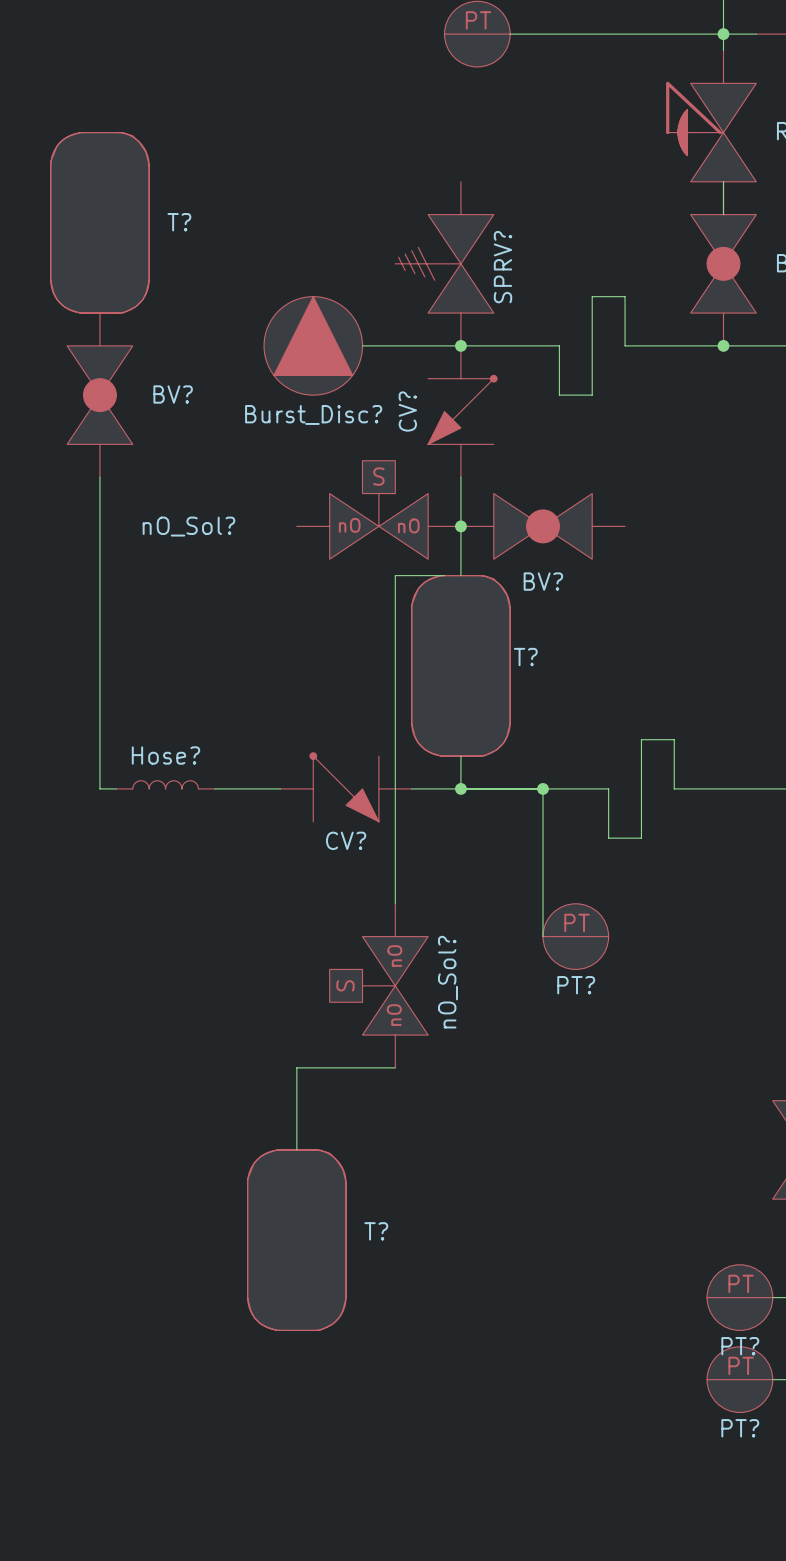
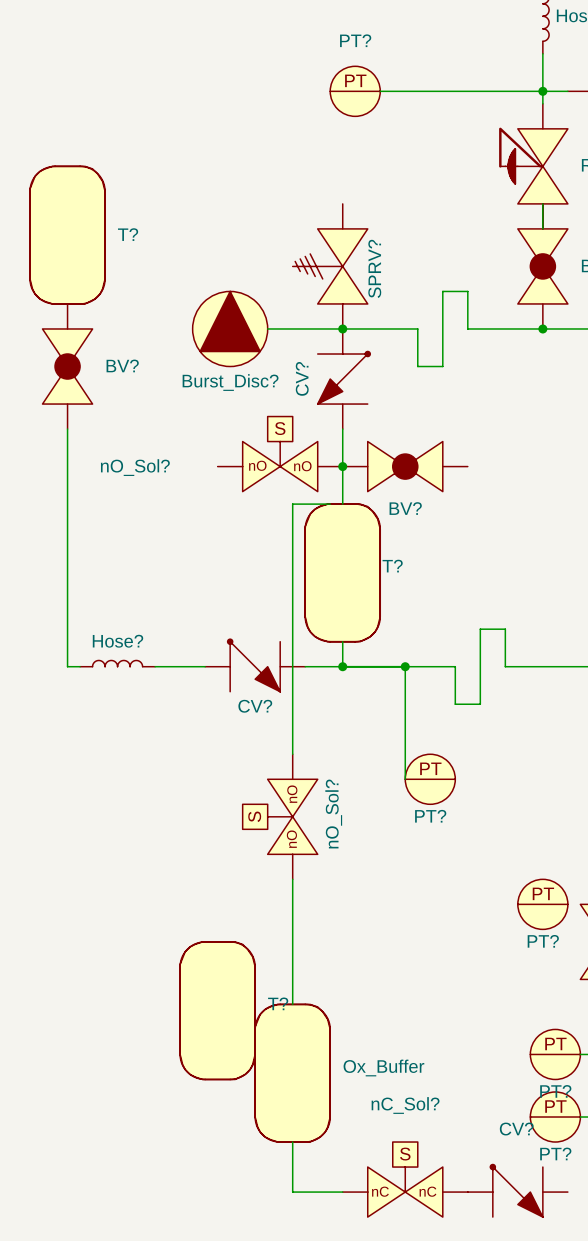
wire: (395, 1067) (296, 1067) (296, 1149) -> (292, 879) (292, 1004)
PT?: none -> (542, 904)
Ox_Buffer: none -> (292, 1073)
wire: none -> (292, 1142) (292, 1192) (342, 1192)
nC_Sol?: none -> (405, 1179)
CV?: none -> (517, 1190)

